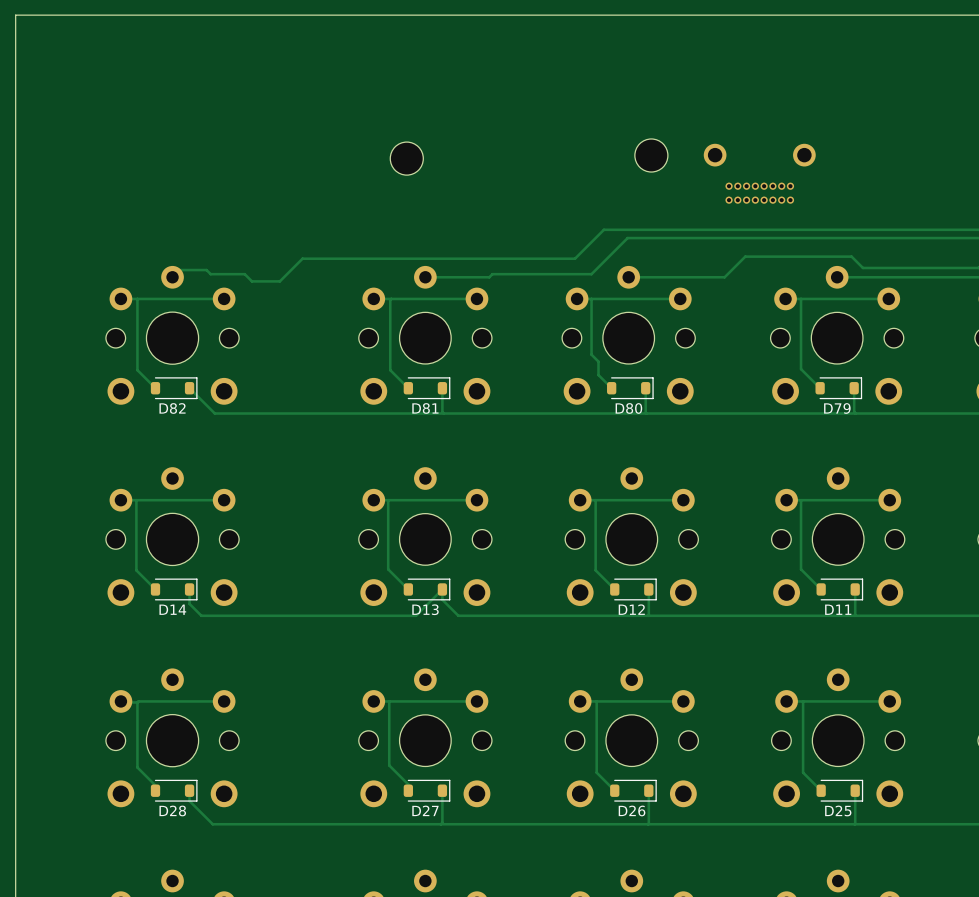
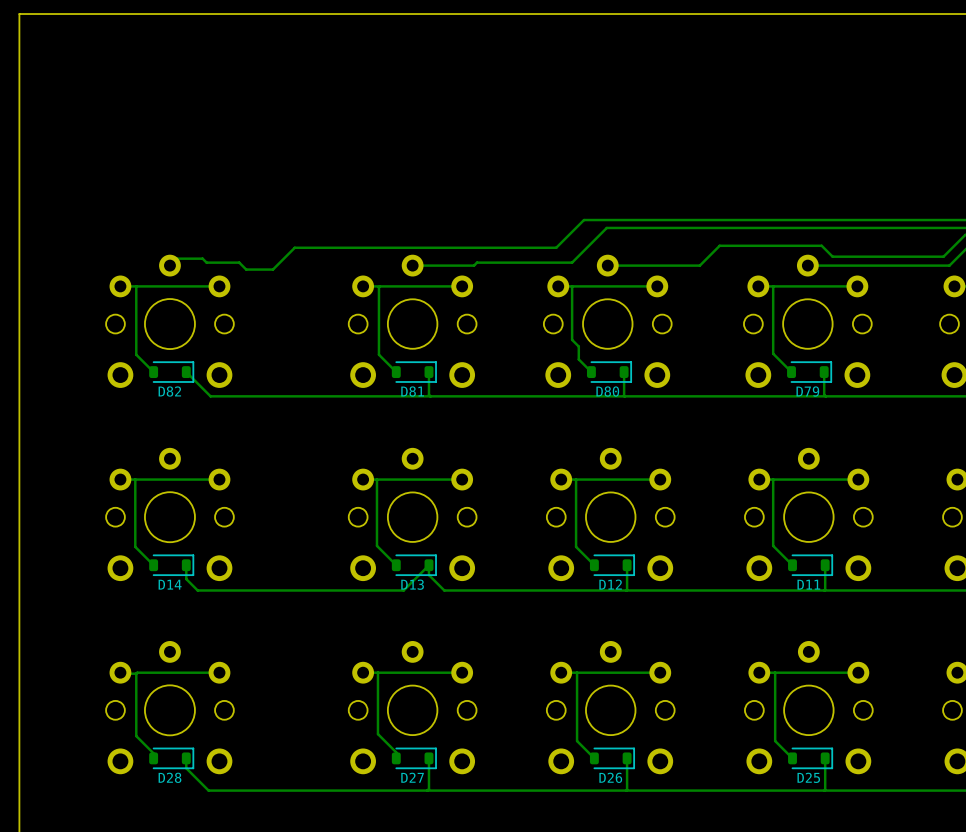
part: (651, 155) -> none
part: (406, 158) -> none
part: (759, 173) -> none

